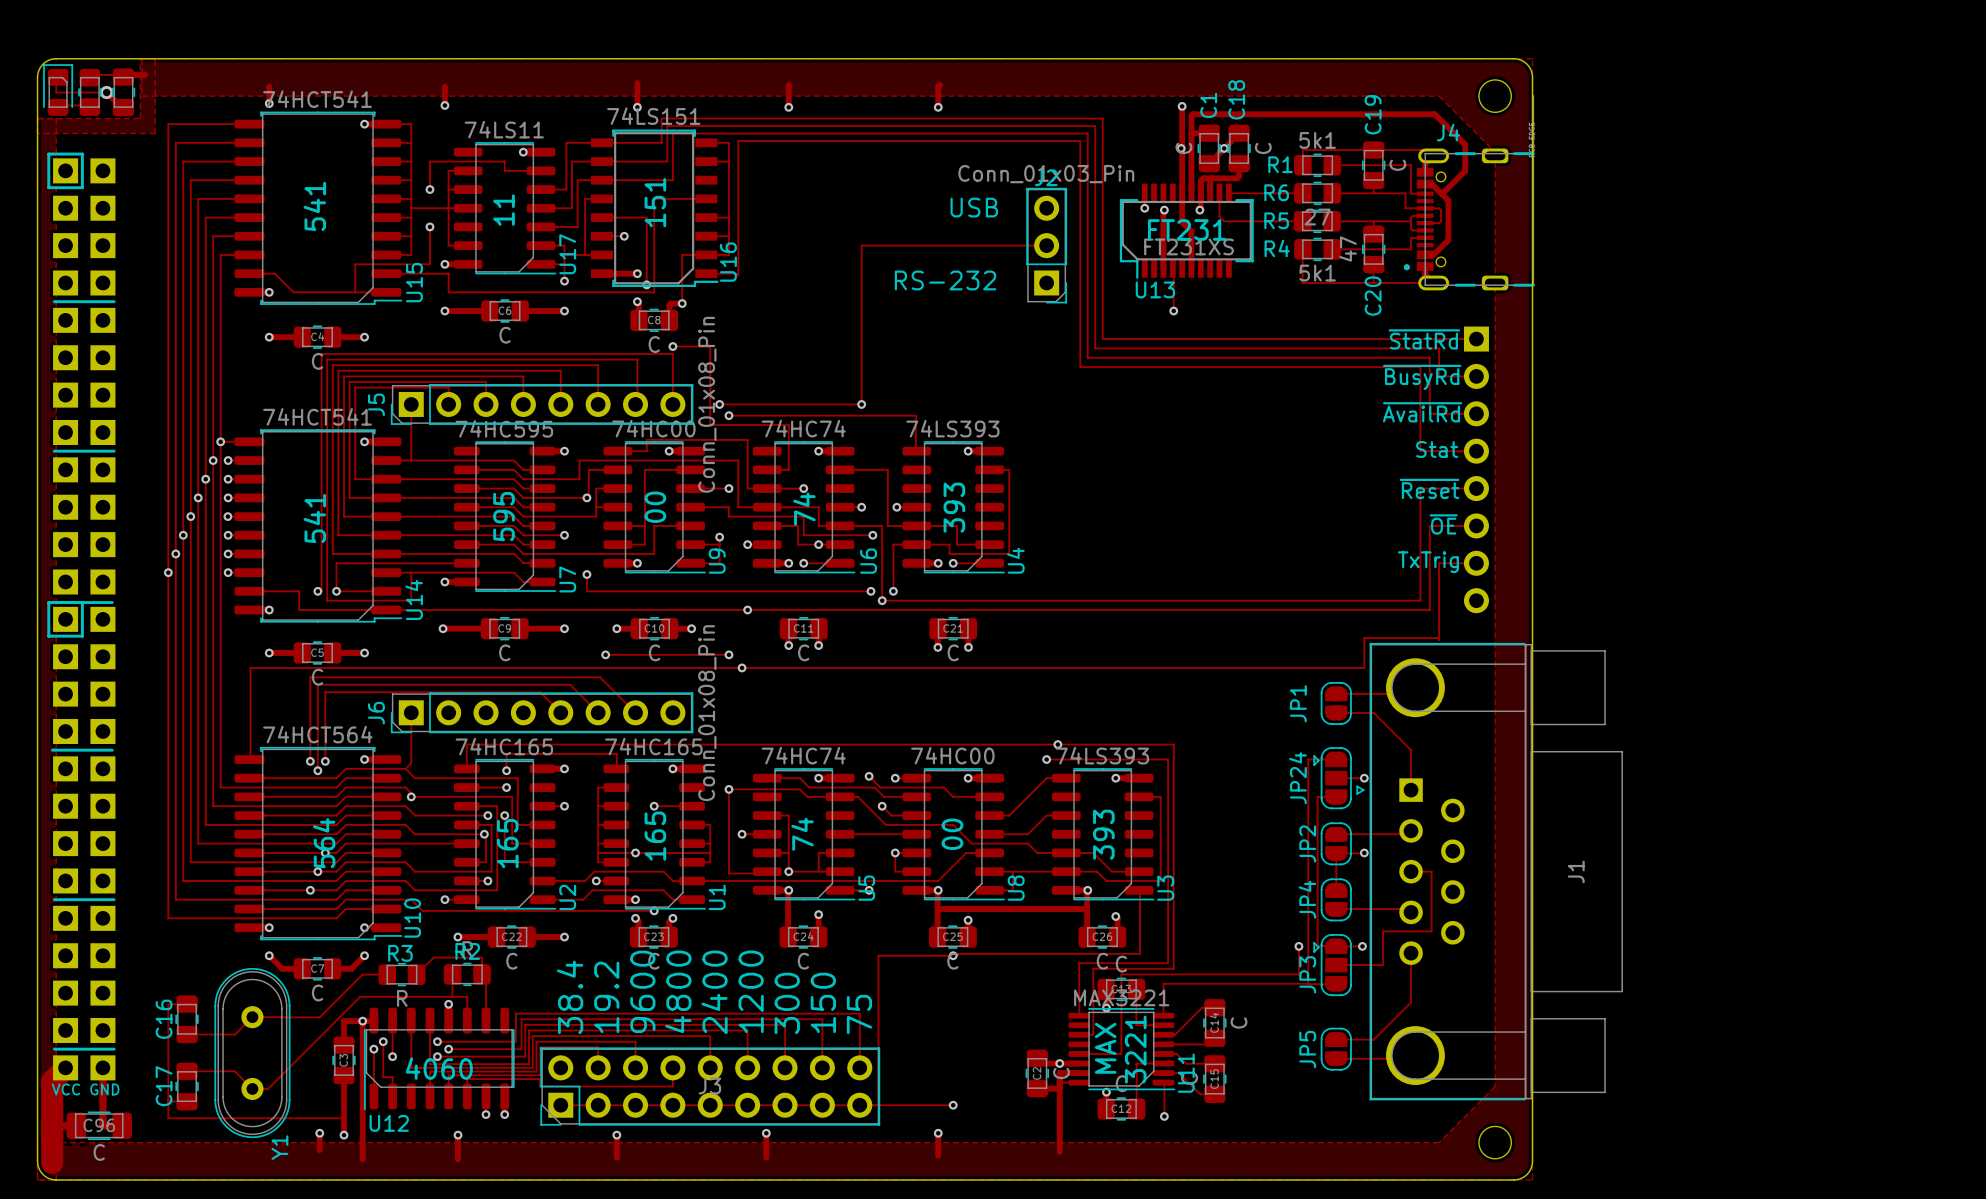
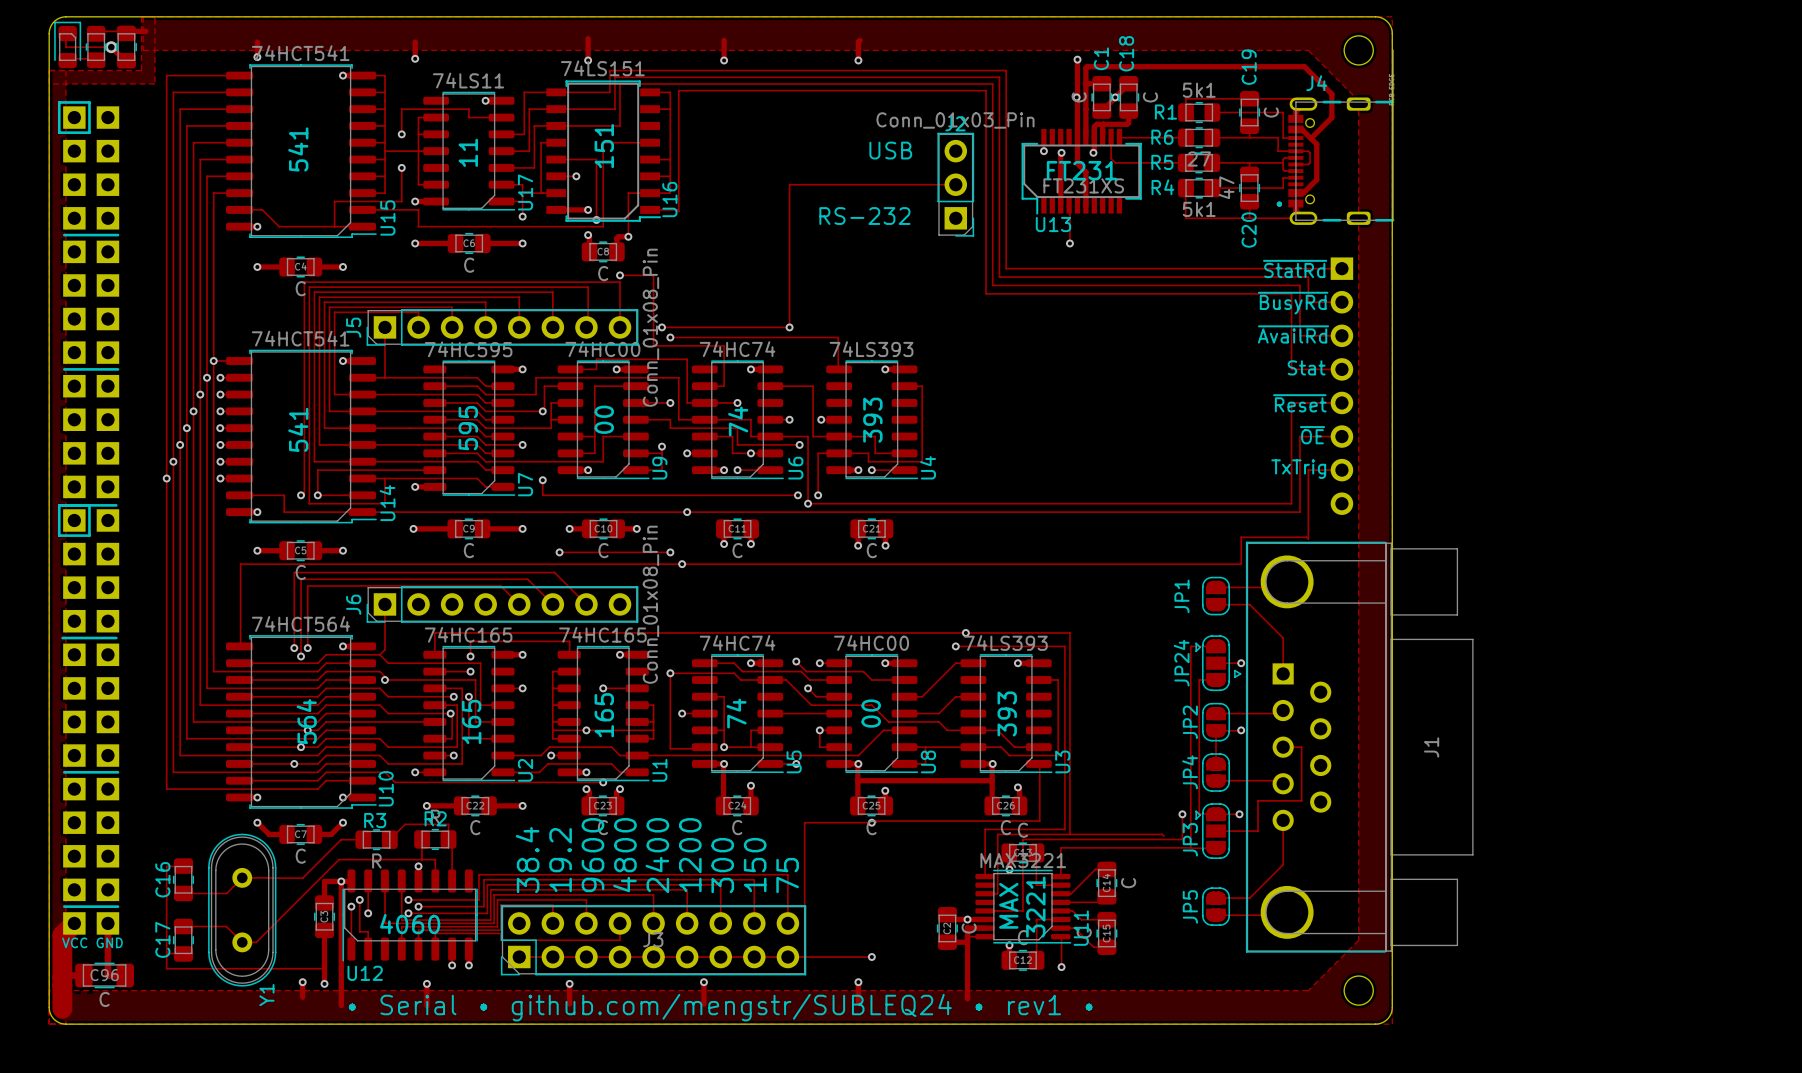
track: none -> (1069, 834) (1162, 834) (1163, 836)
text: none -> • Serial • github.com/mengstr/SUBLEQ24 • rev1 • (720, 1007)

